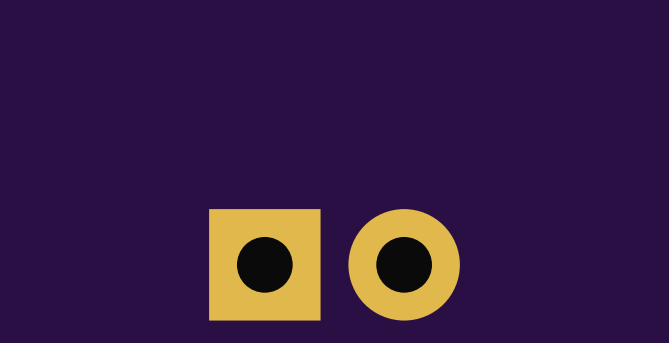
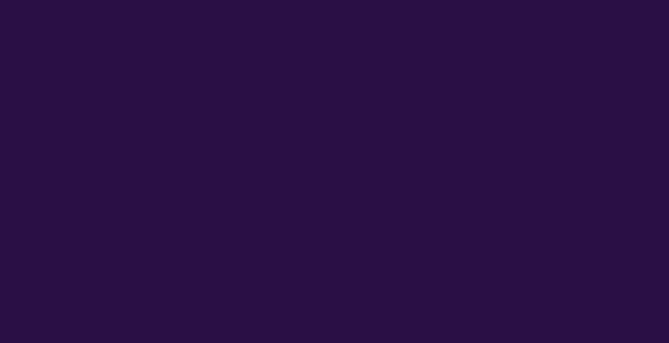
part: (334, 264) -> none

